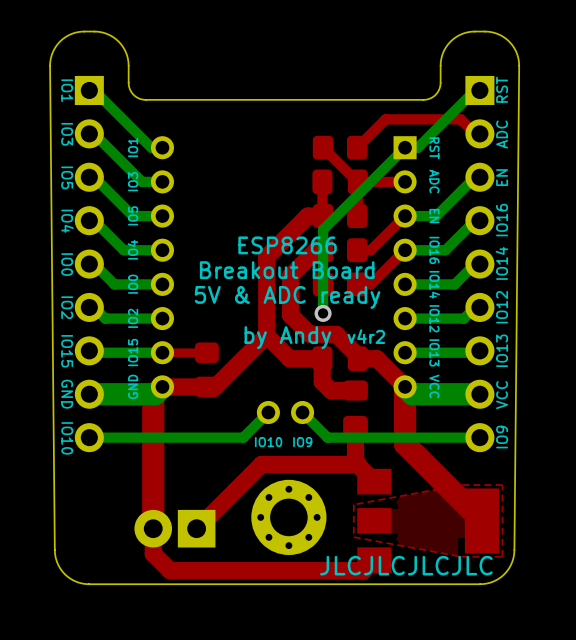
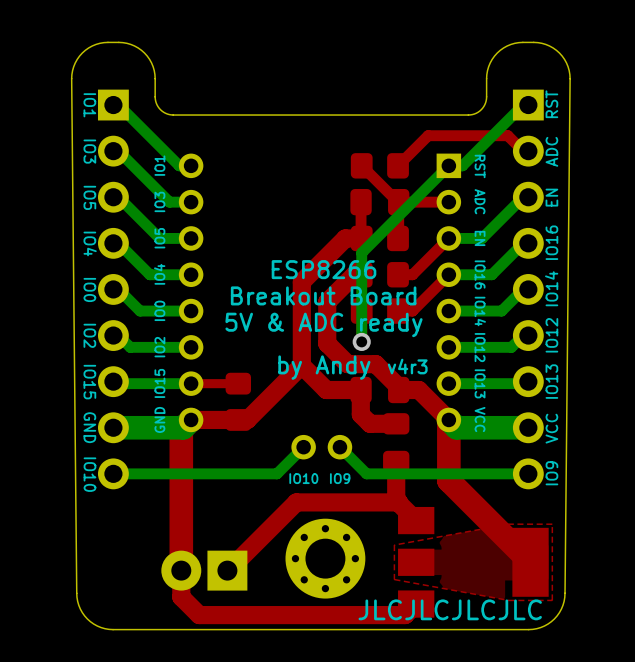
text: v4r2 (366, 336) -> v4r3 (407, 366)

